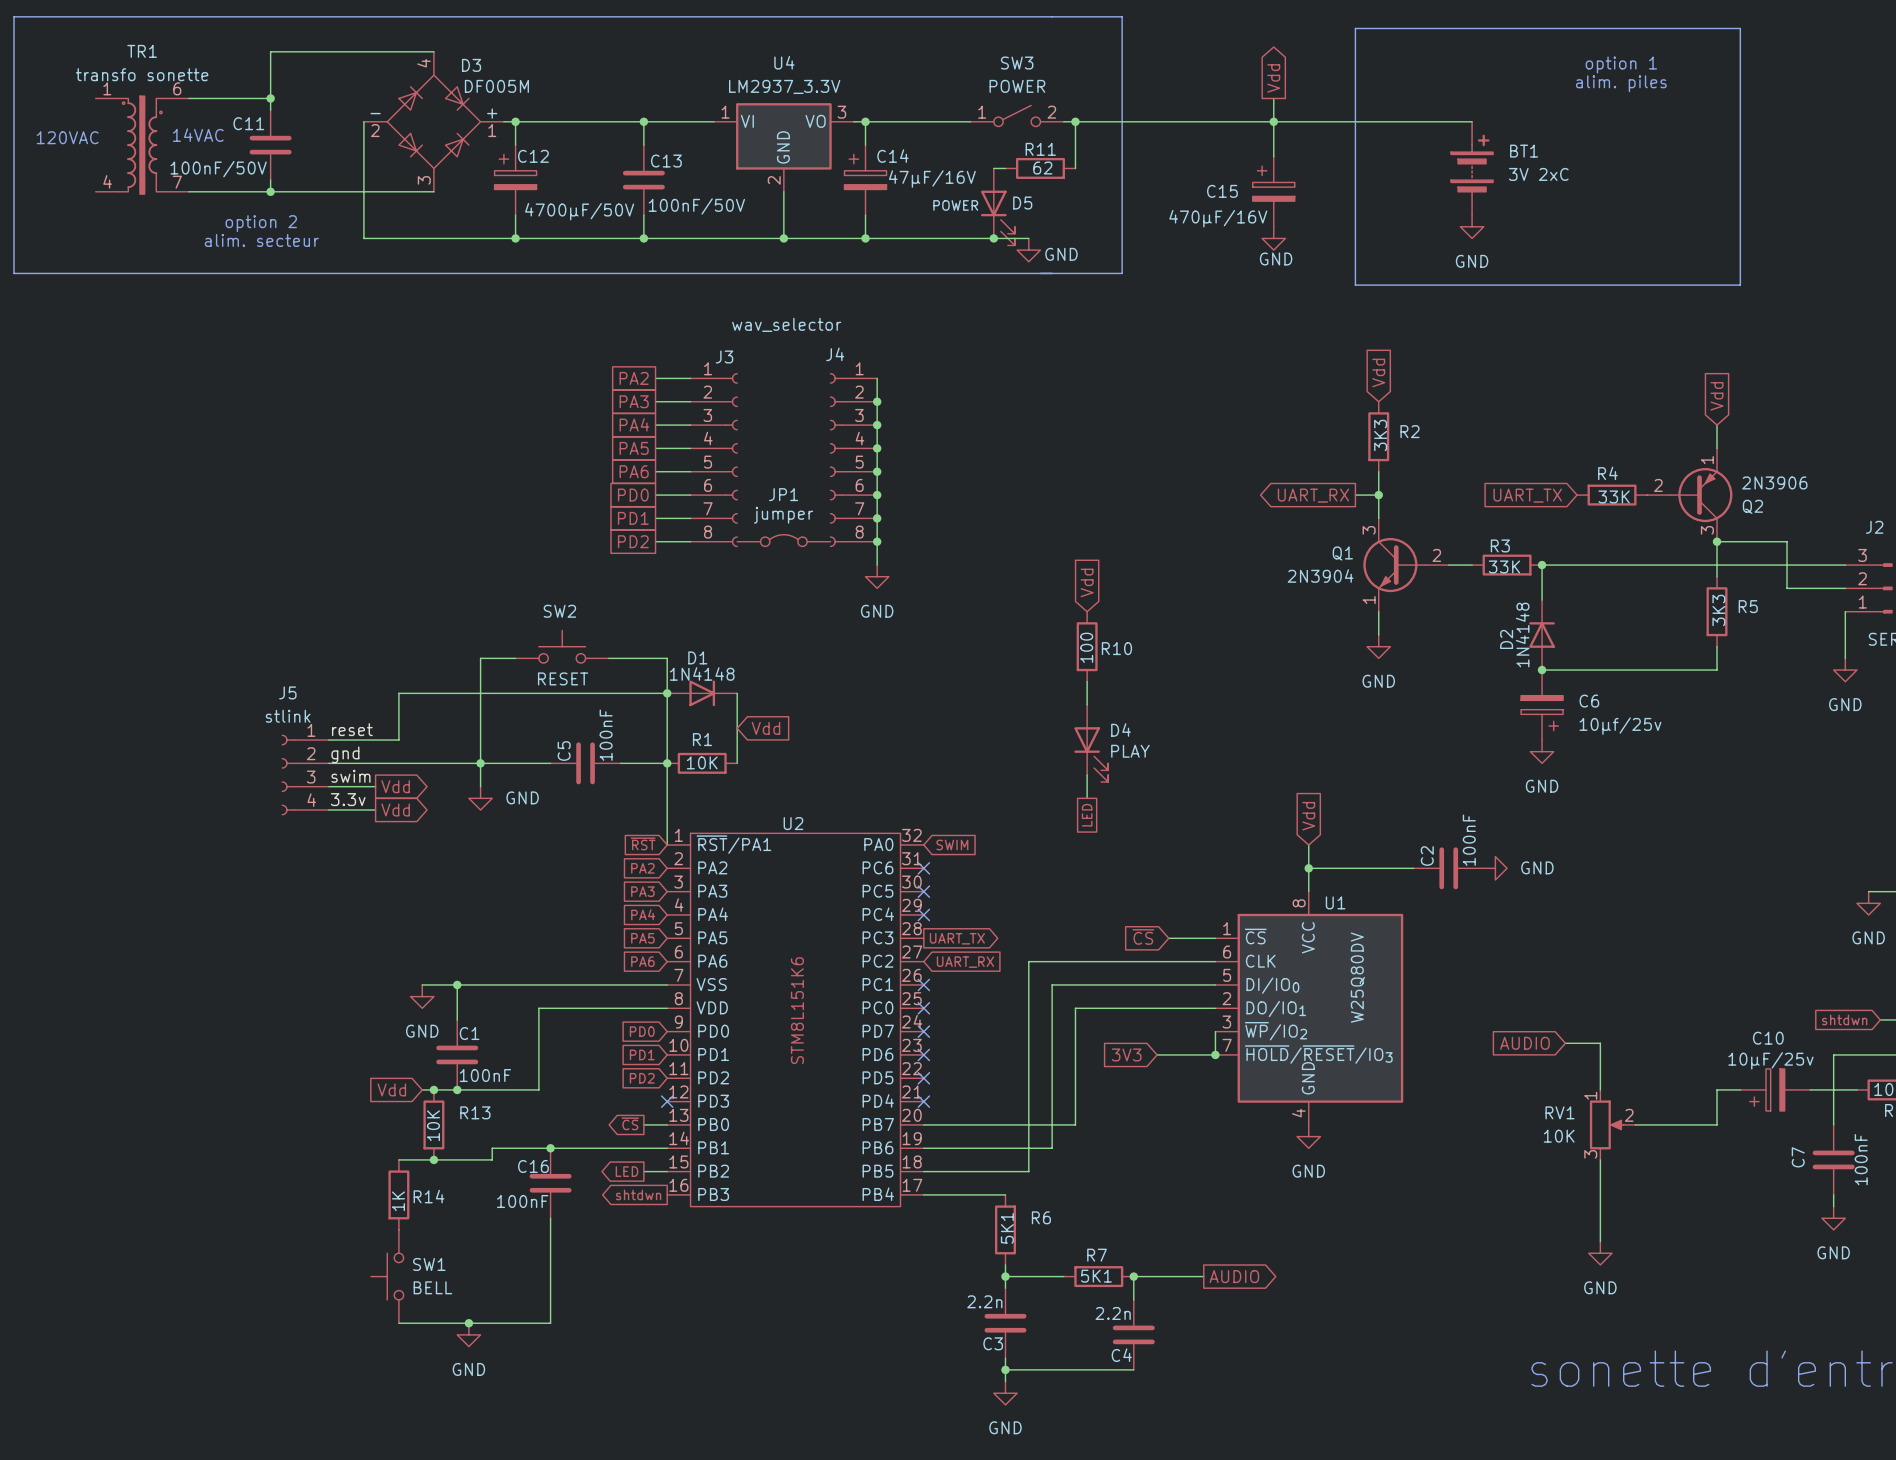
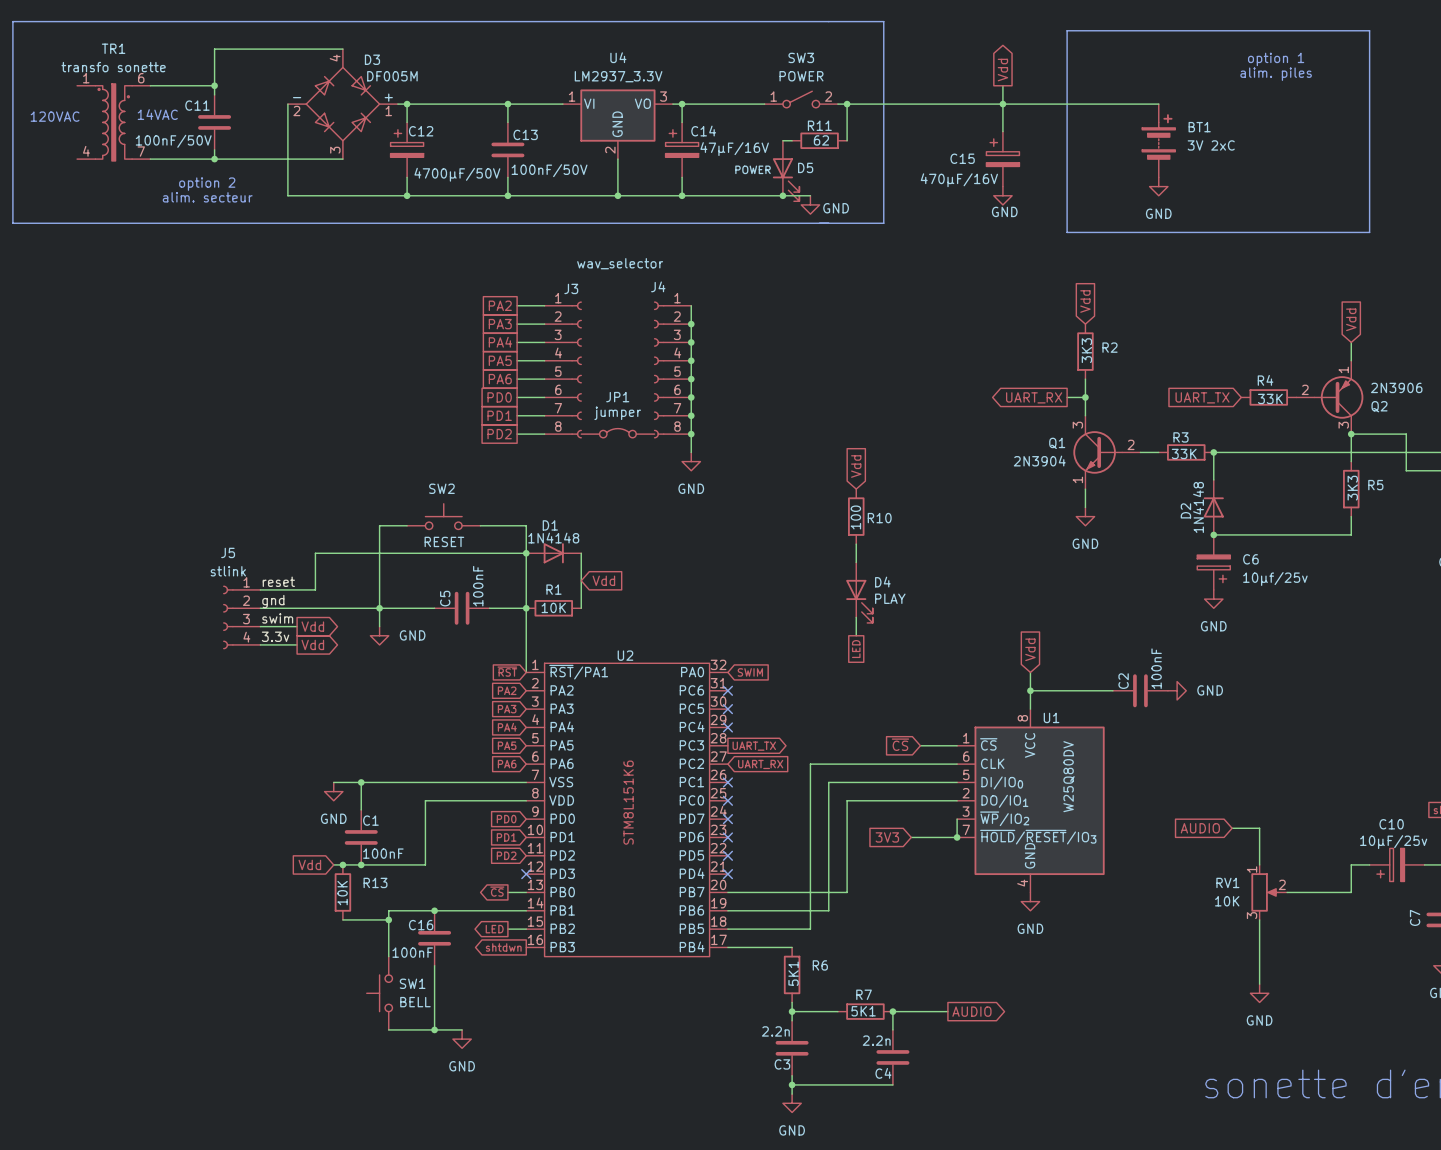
wire: (398, 1159) (433, 1159) -> none
junction: (433, 1159) -> none
wire: none -> (388, 919) (388, 956)
junction: none -> (388, 919)
R14: 1K (398, 1194) -> none
SW1 position: (387, 1276) -> (379, 993)
wire: none -> (388, 1029) (462, 1029)
wire: (550, 1299) (550, 1323) (398, 1323) -> none
junction: none -> (434, 1029)
junction: (468, 1323) -> none
power symbol position: GND (468, 1334) -> GND (462, 1039)

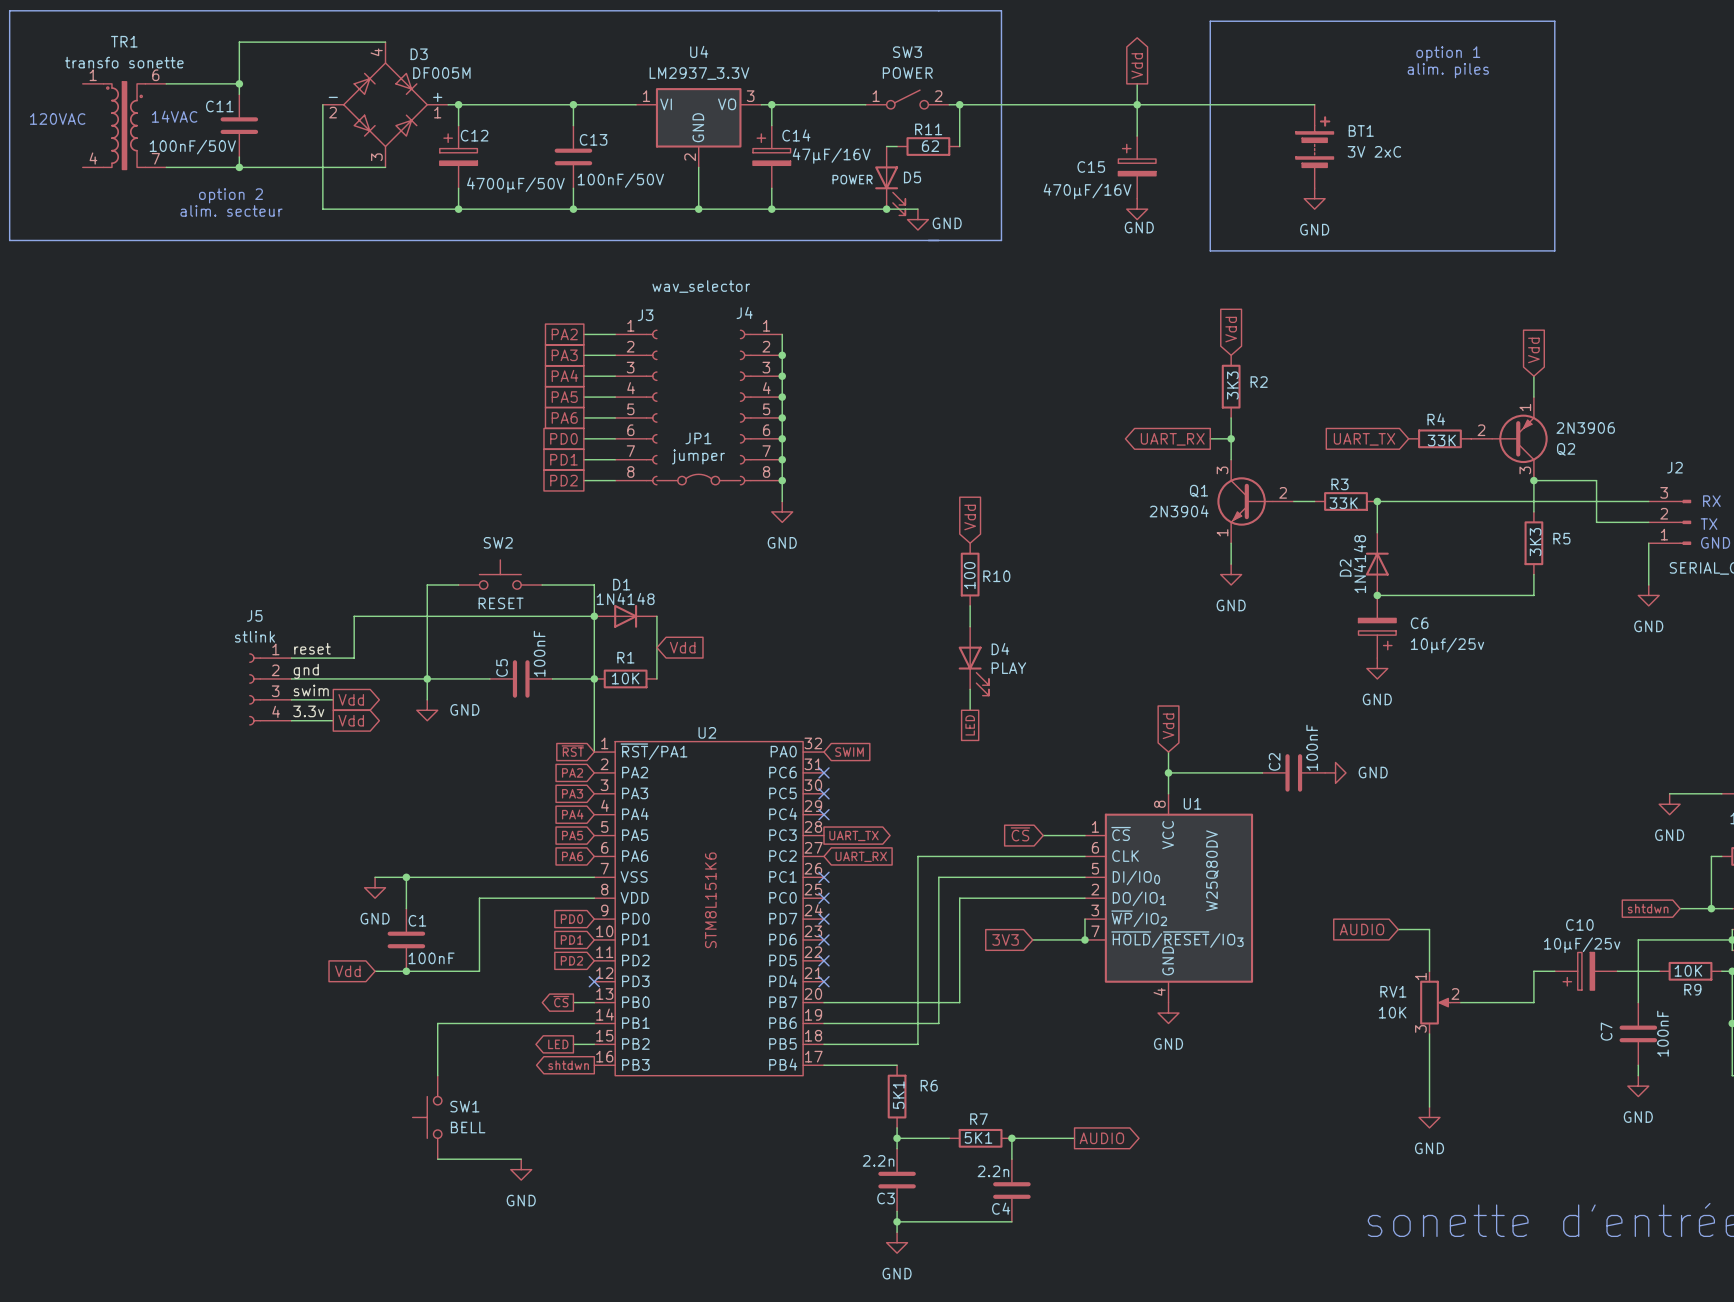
junction: (342, 864) -> none
R13: 10K (342, 892) -> none
junction: (434, 910) -> none
wire: (342, 919) (388, 919) -> none
junction: (388, 919) -> none
C16: 100nF (434, 938) -> none
wire: (434, 965) (434, 1029) -> none
junction: (434, 1029) -> none

